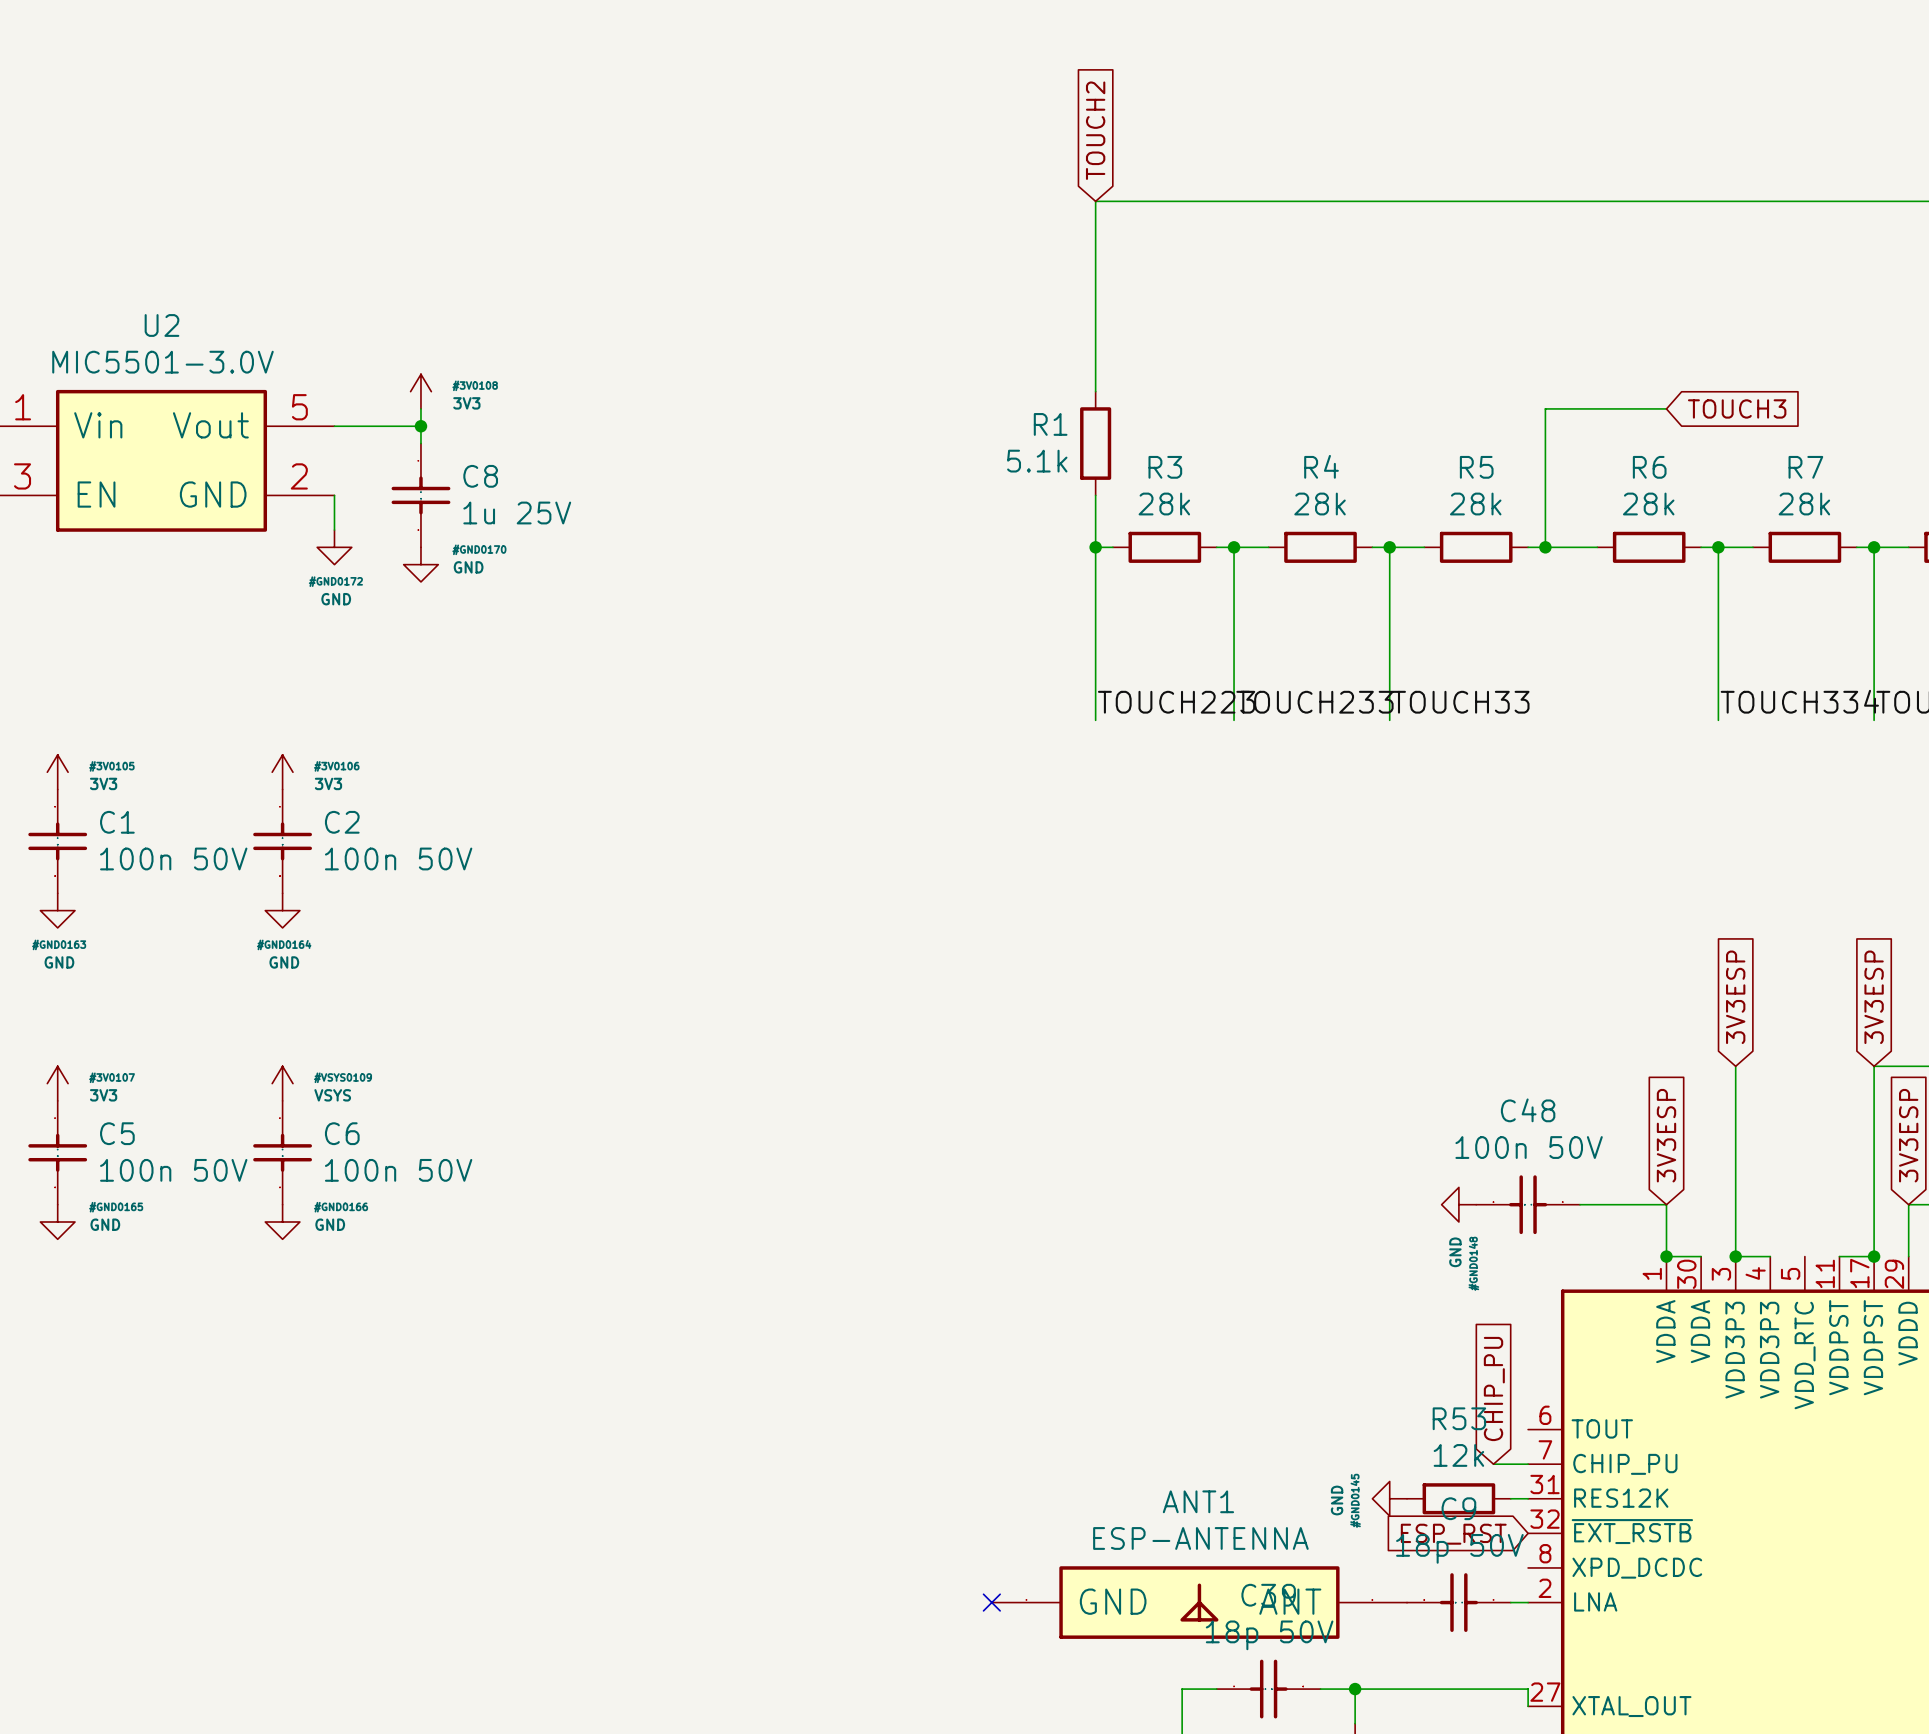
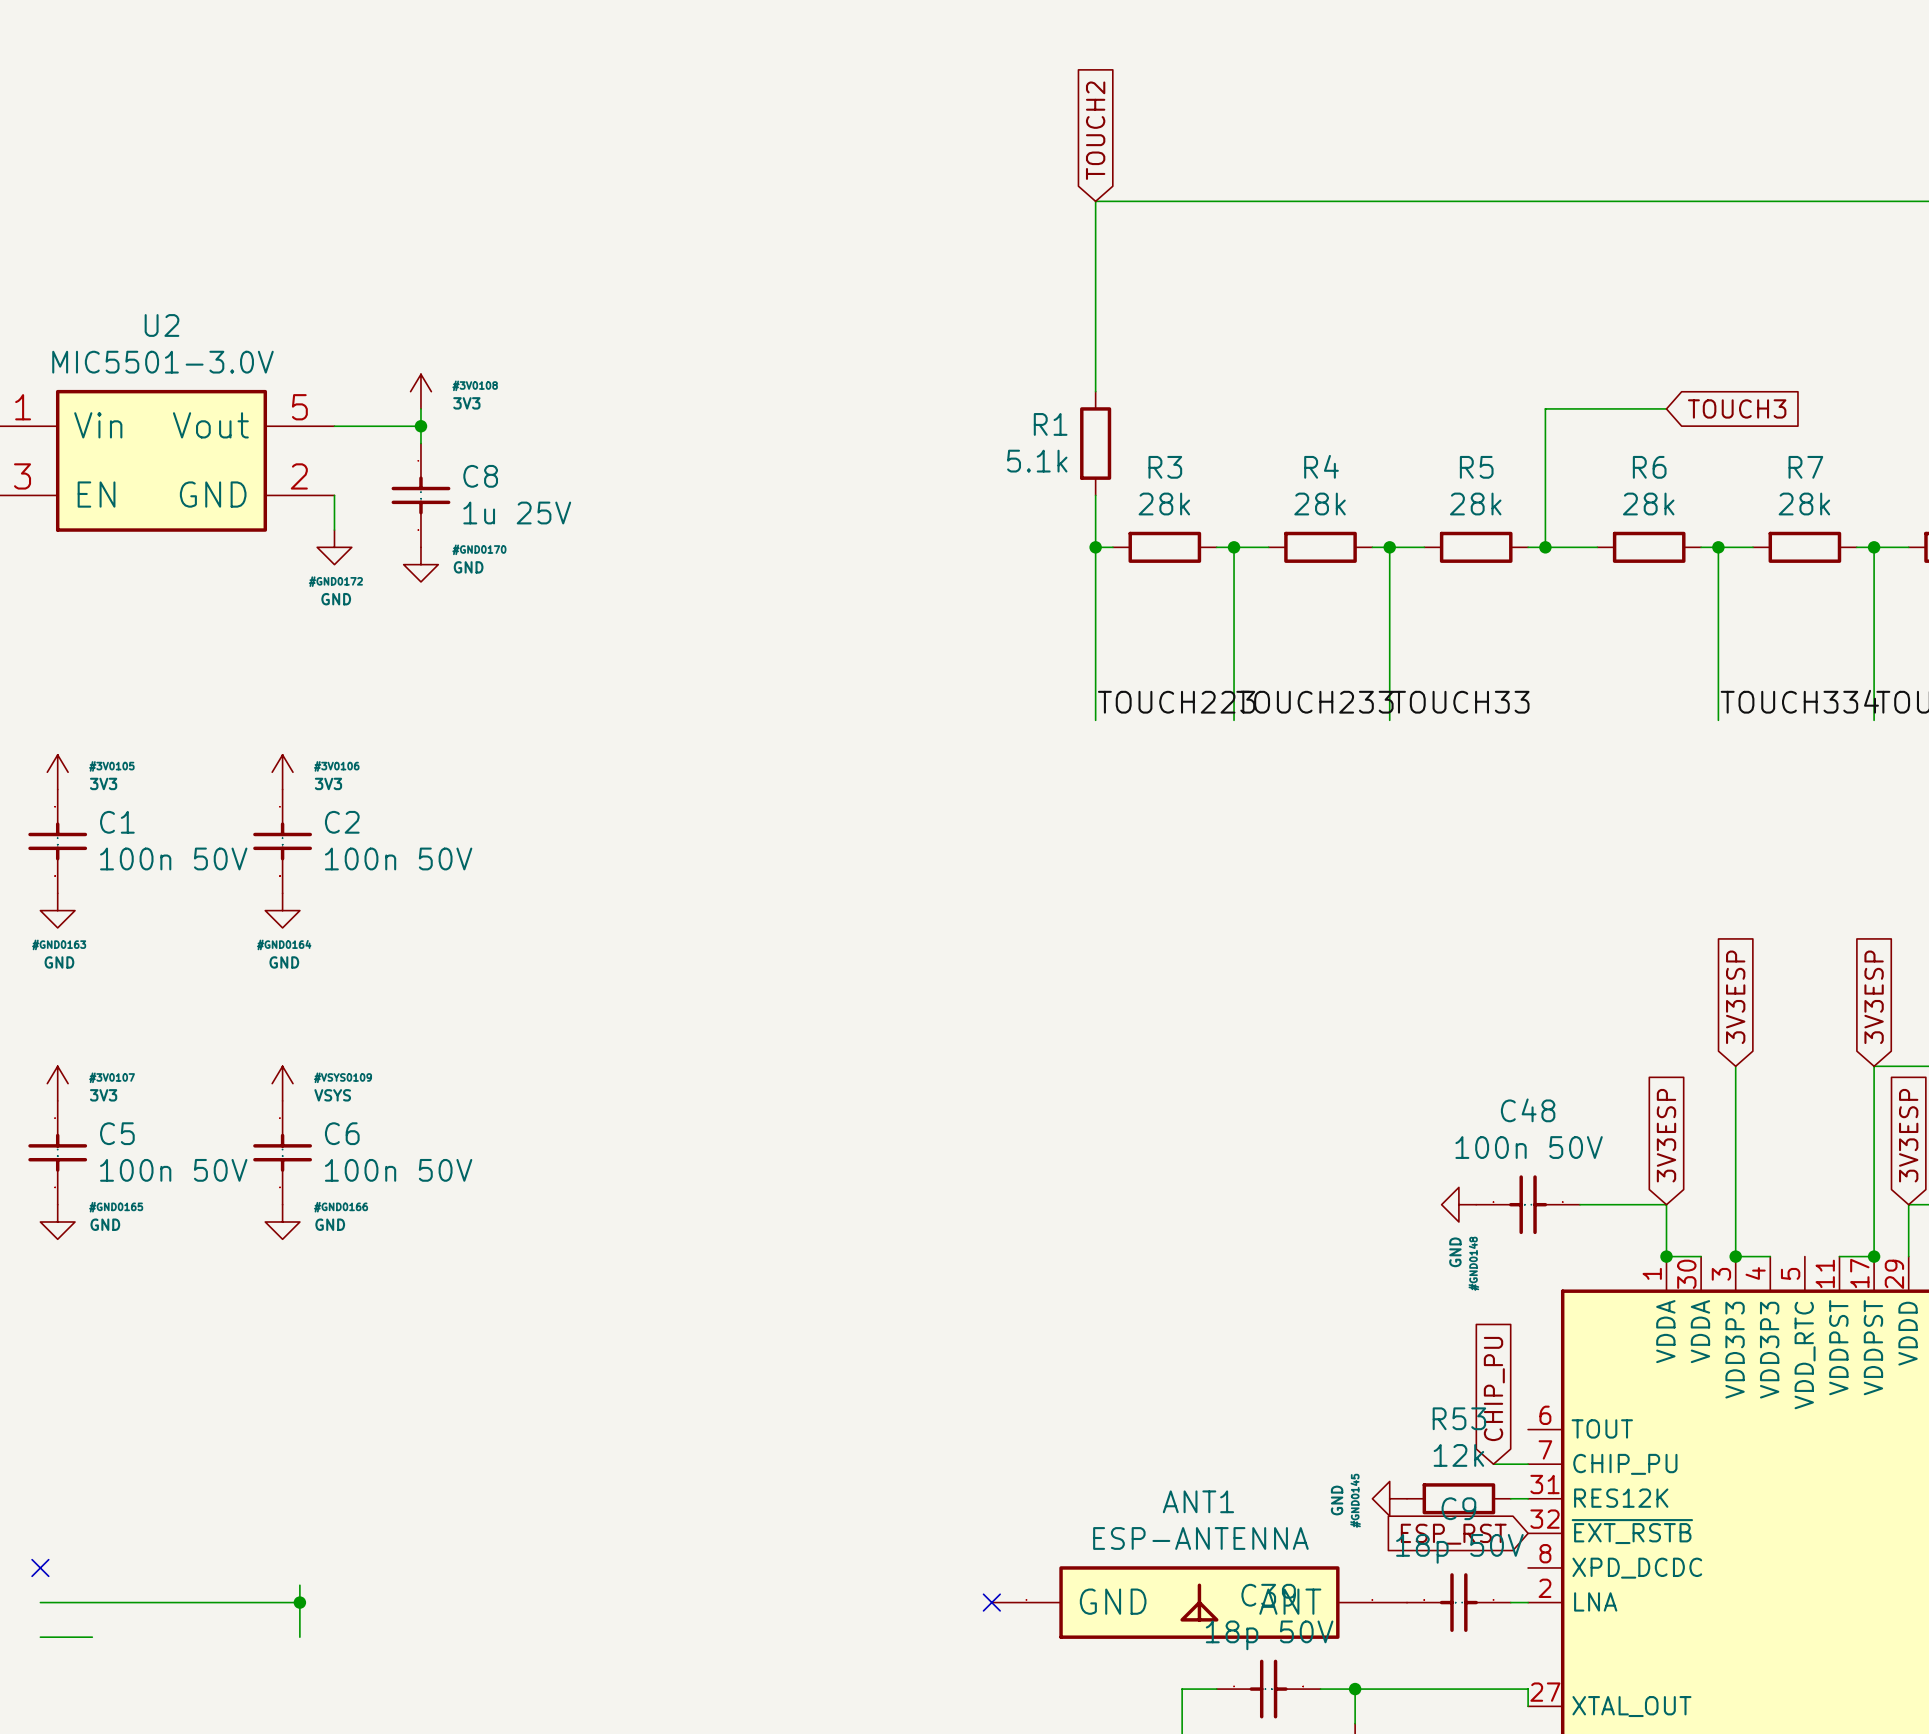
no-connect mark: none -> (40, 1567)
wire: none -> (299, 1585) (299, 1637)
wire: none -> (40, 1602) (299, 1602)
junction: none -> (299, 1602)
wire: none -> (40, 1637) (92, 1637)

